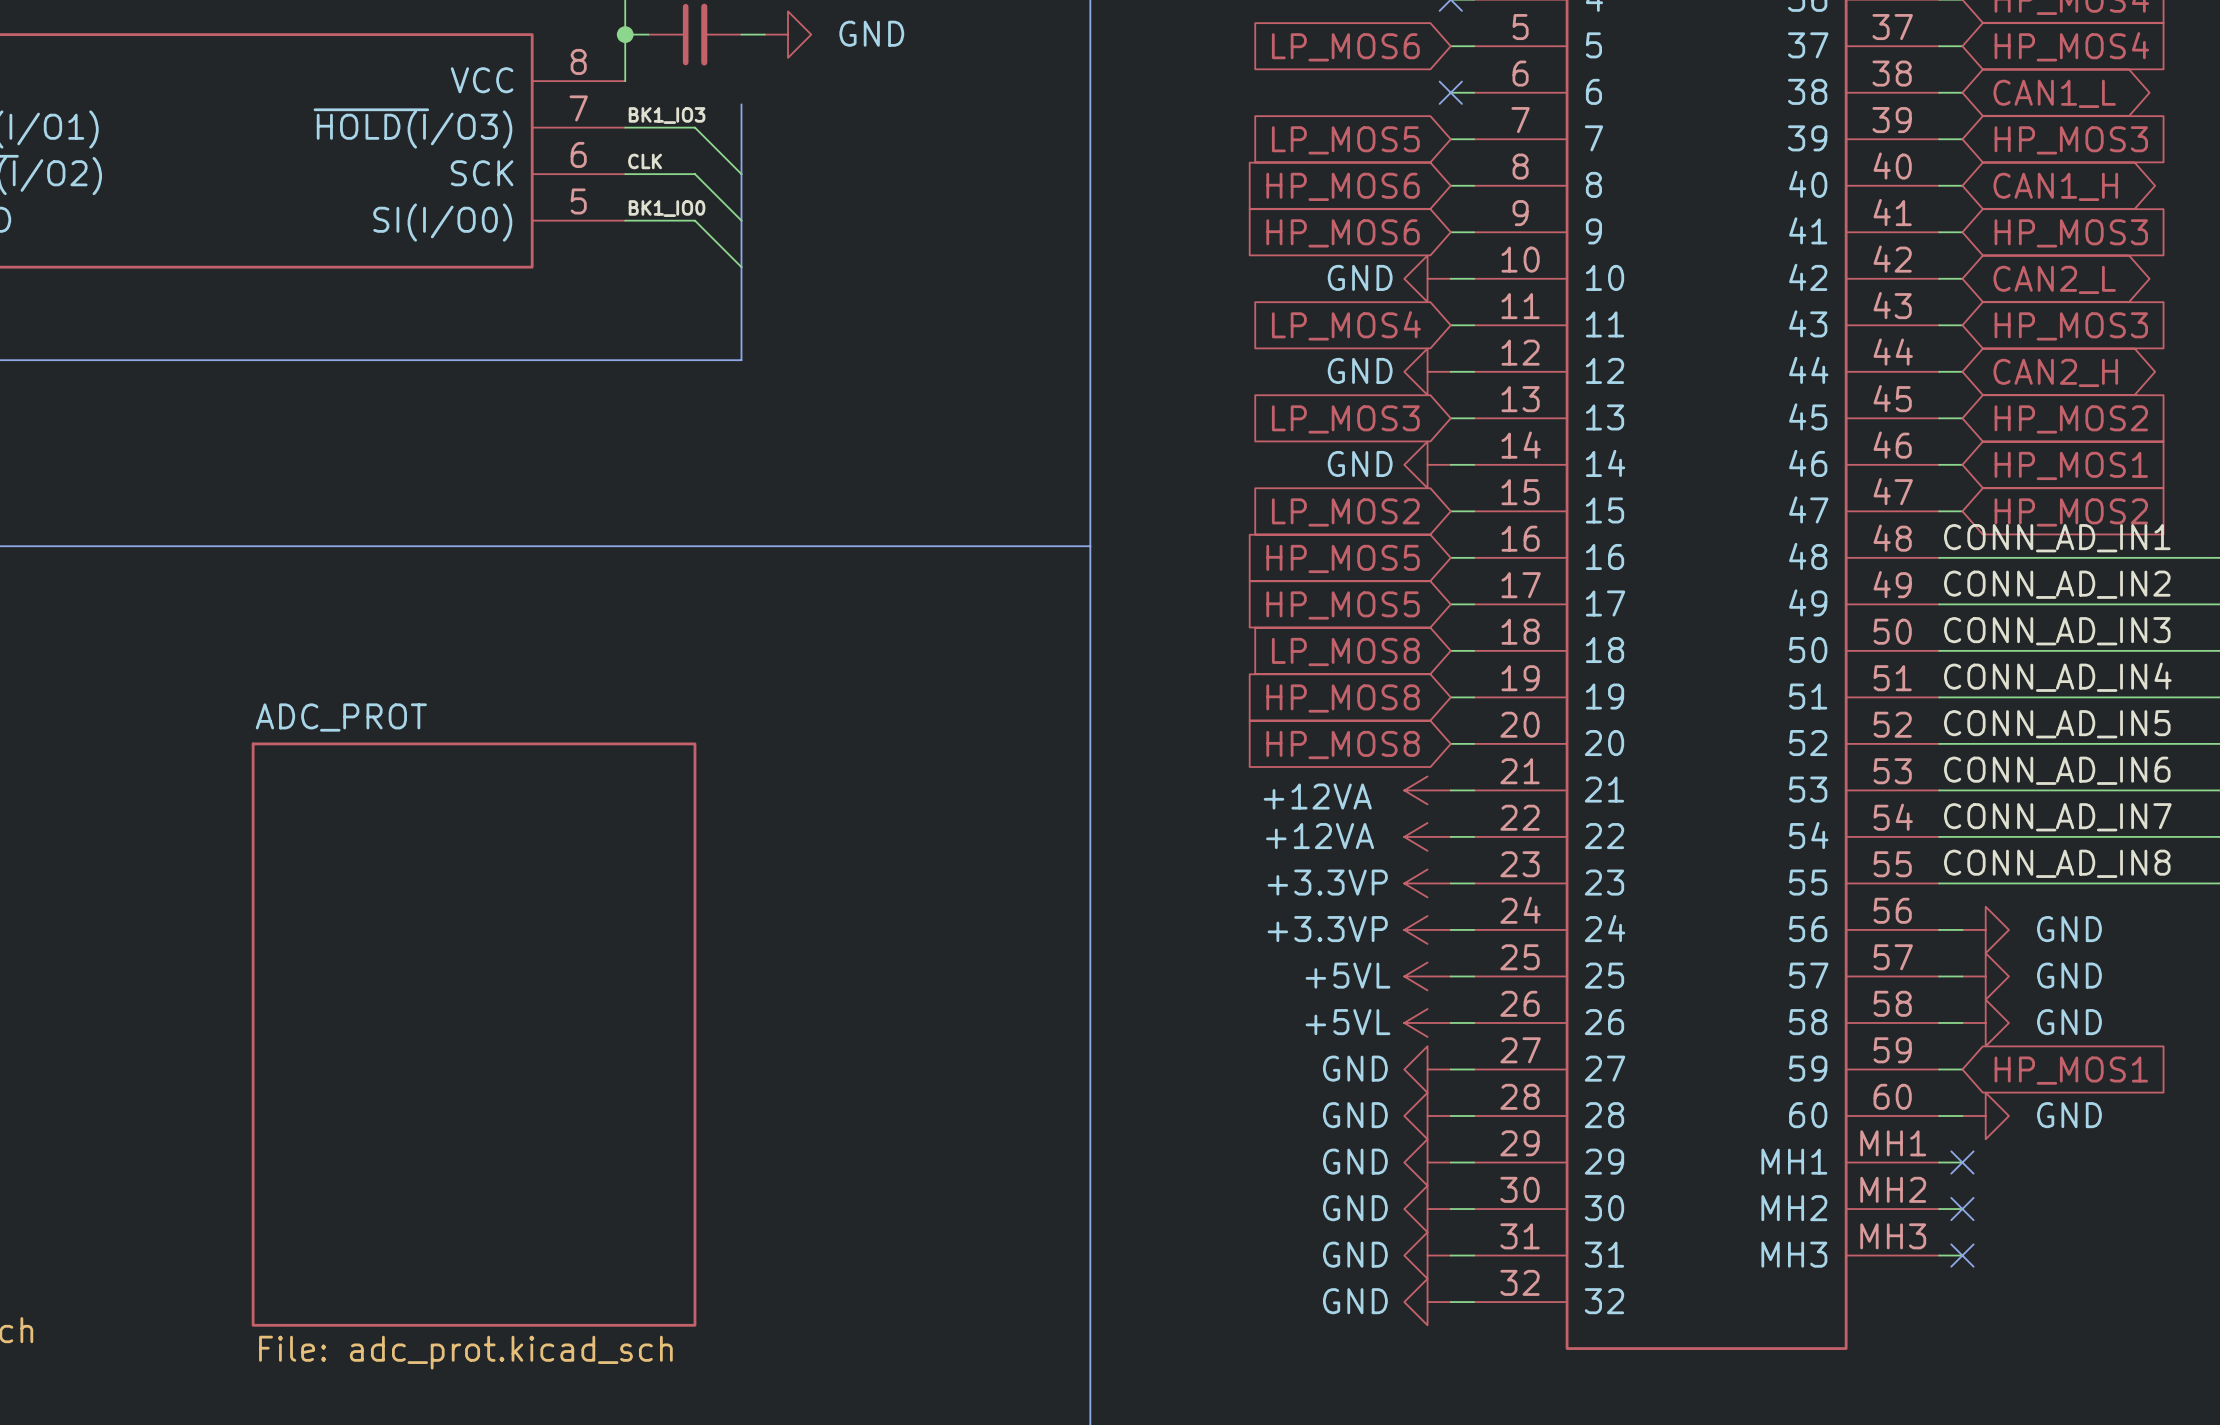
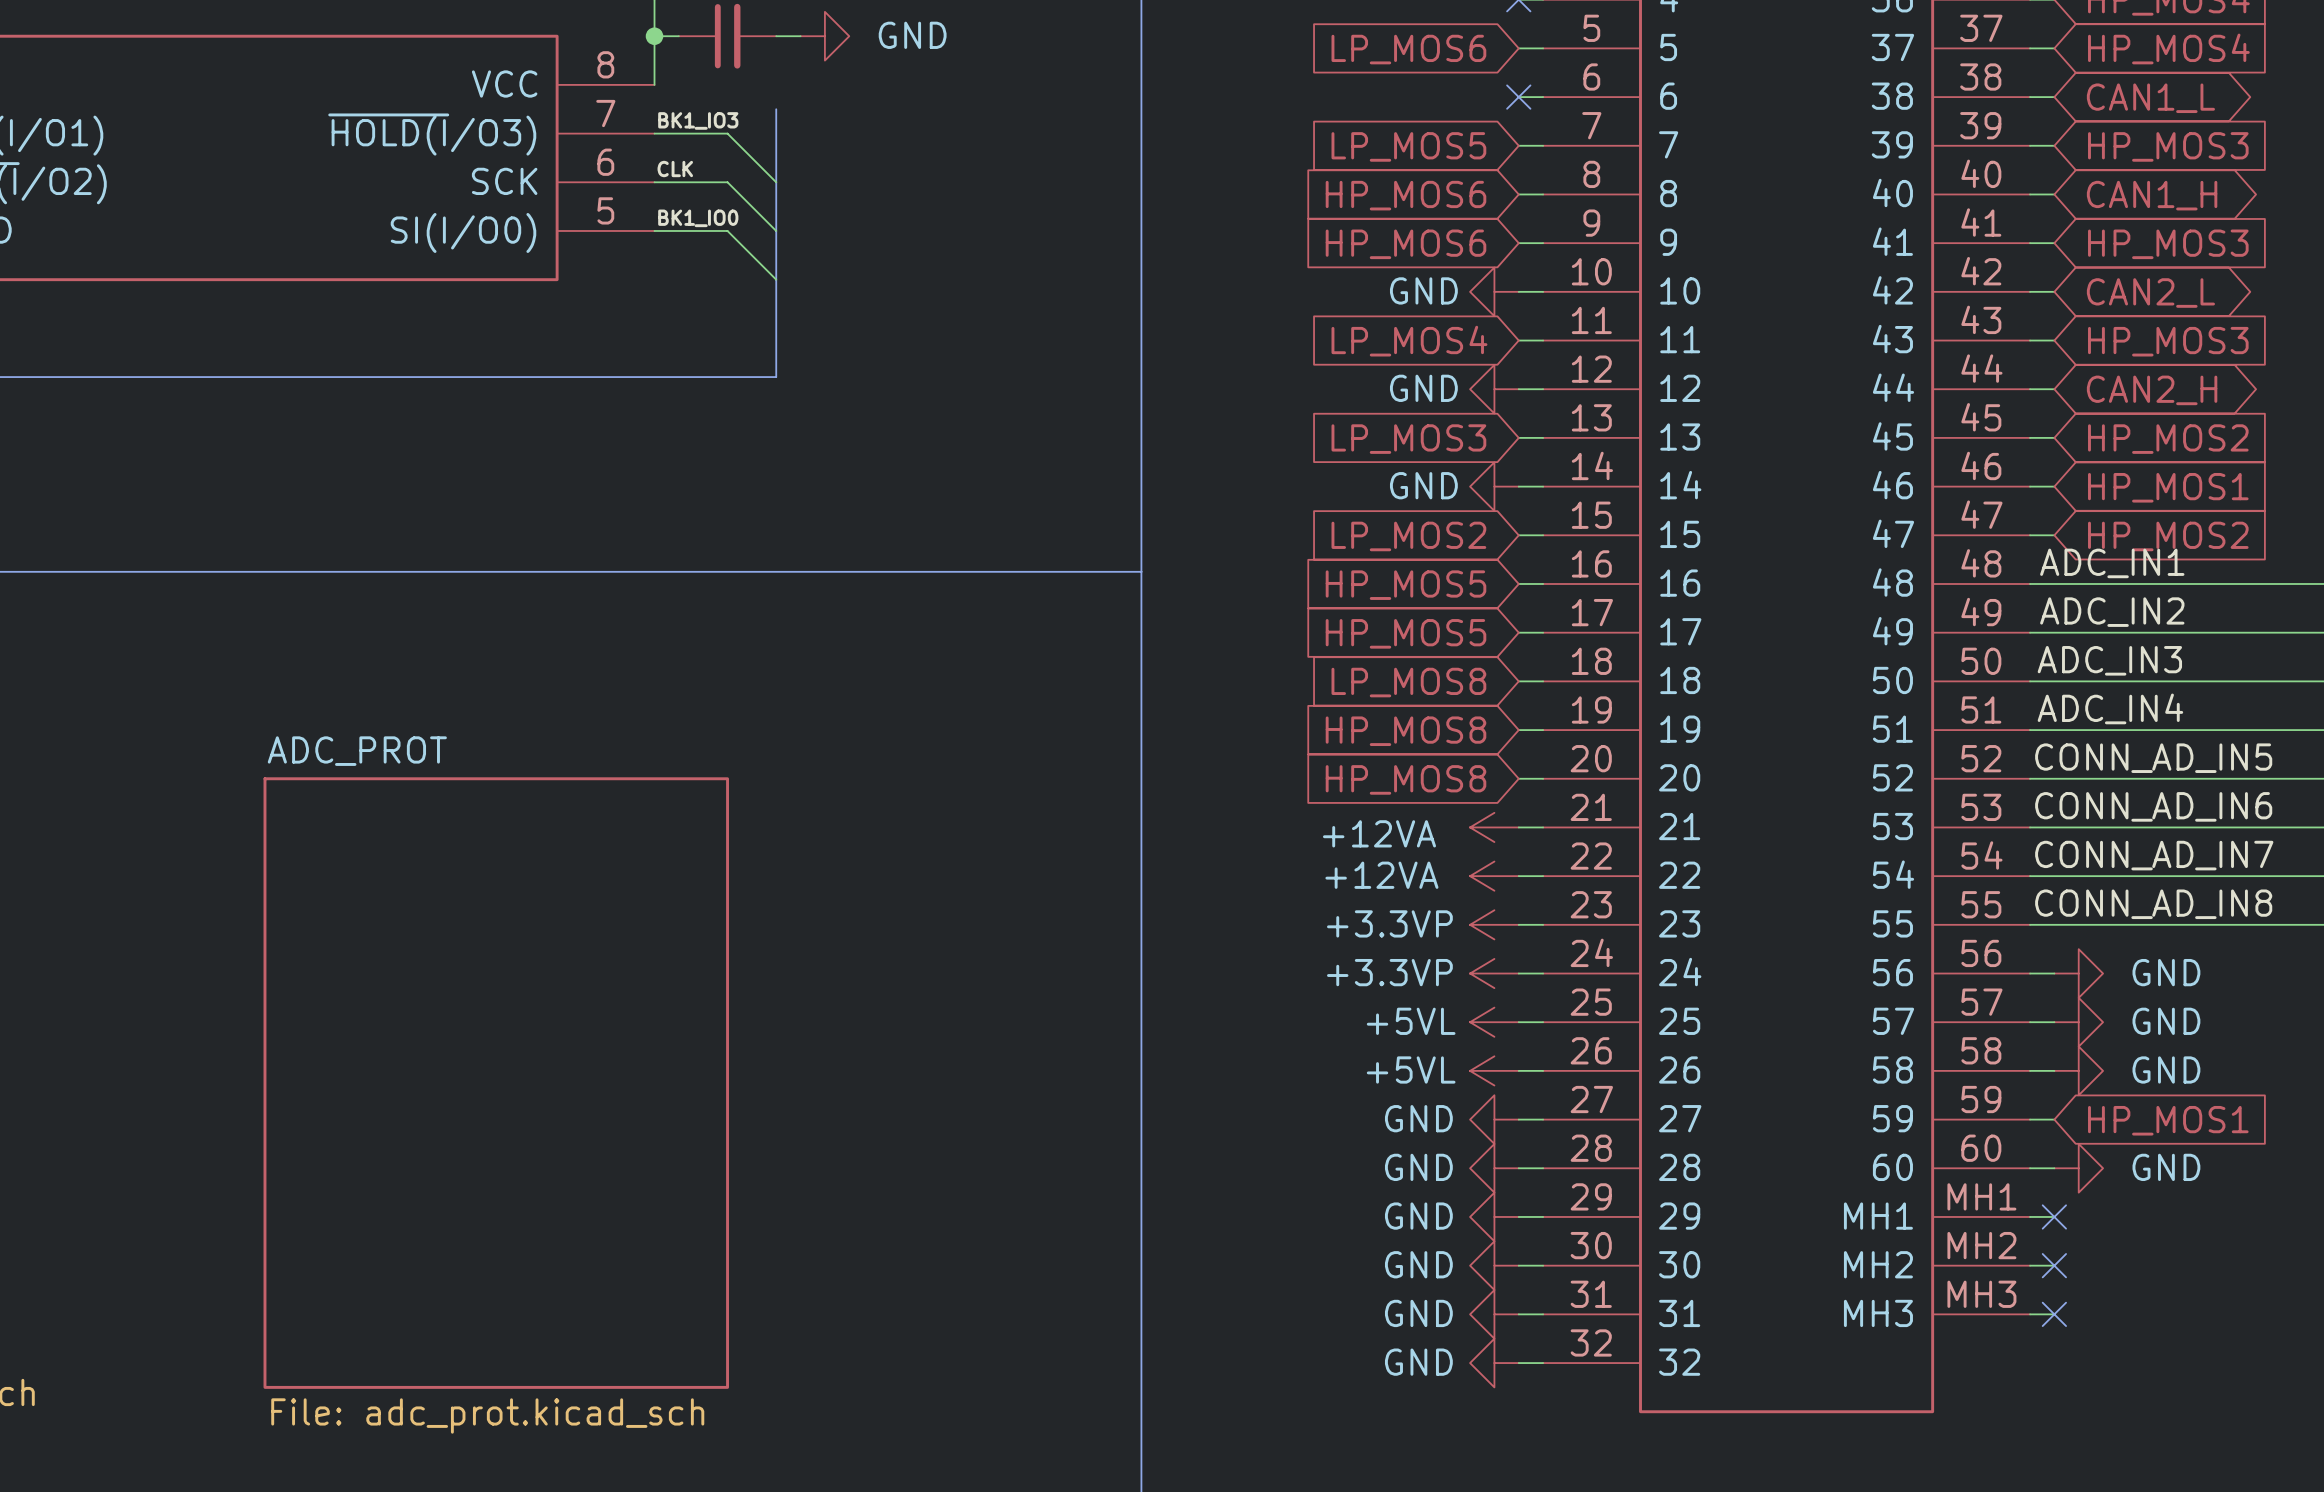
label: CONN_AD_IN1 (2057, 538) -> ADC_IN1 (2112, 563)
label: CONN_AD_IN2 (2057, 584) -> ADC_IN2 (2112, 612)
label: CONN_AD_IN3 (2057, 631) -> ADC_IN3 (2109, 660)
label: CONN_AD_IN4 (2057, 677) -> ADC_IN4 (2110, 708)

